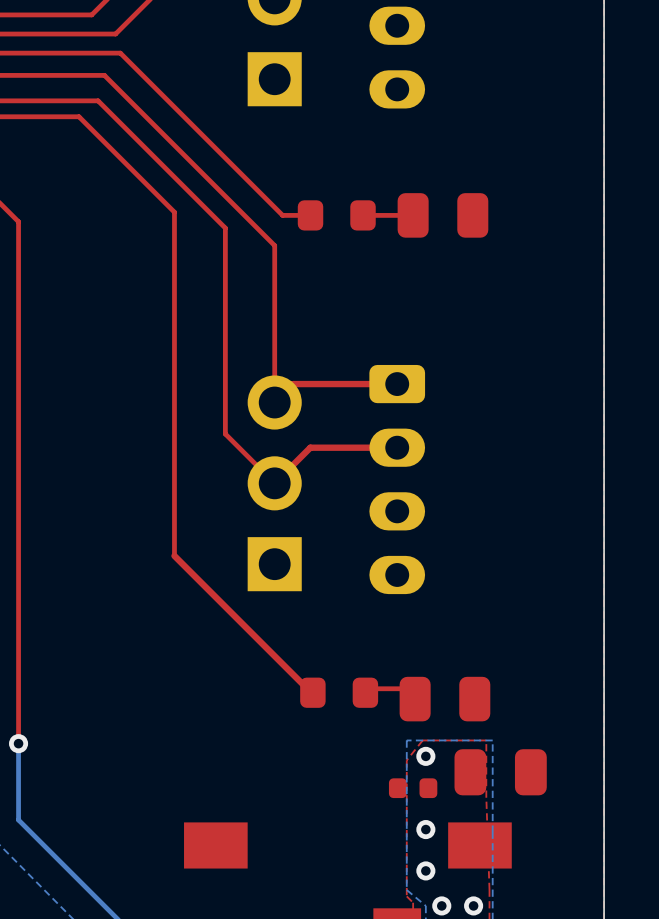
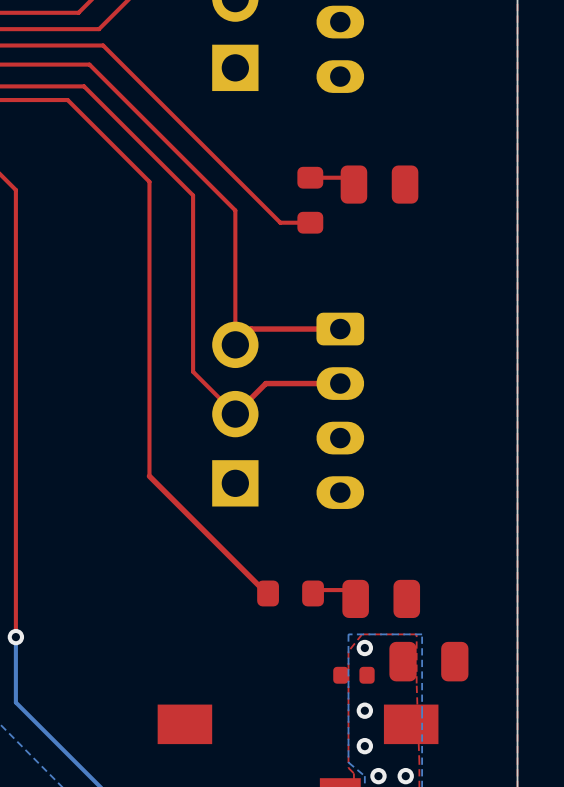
top track: none -> (347, 177) (310, 177)
top track: (310, 215) (282, 215) -> (310, 222) (280, 222) (242, 184)
part rotation: 0° (336, 215) -> 90° clockwise (310, 200)
top track: (413, 215) (363, 215) -> none

